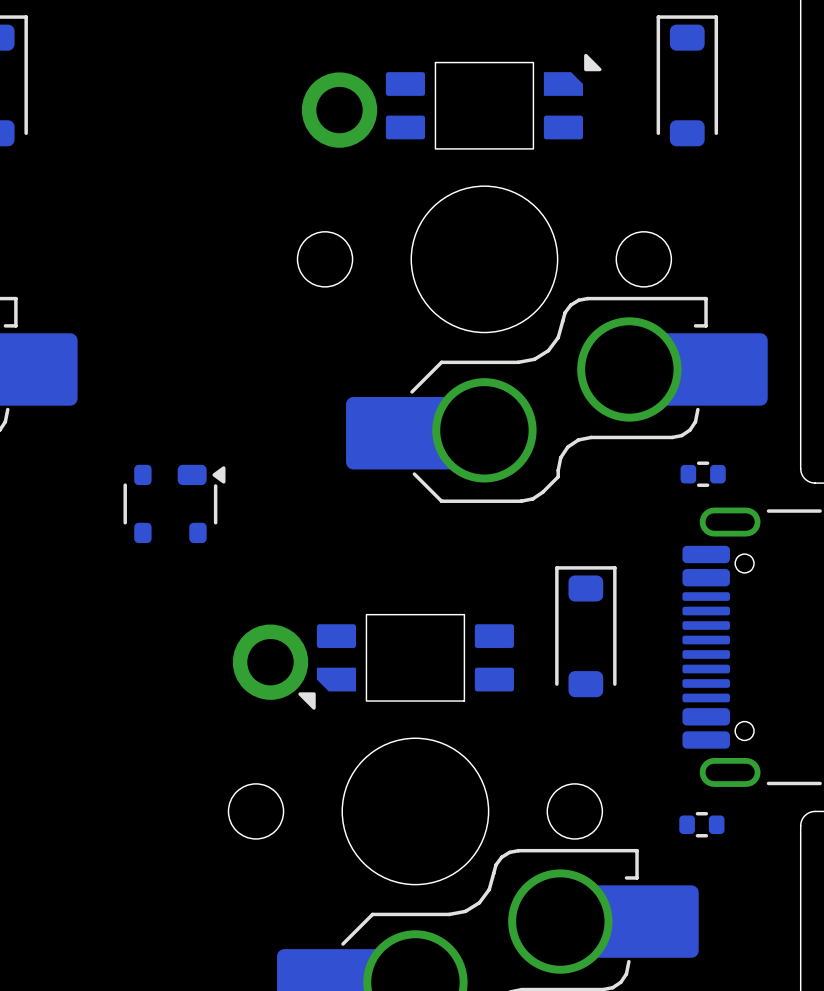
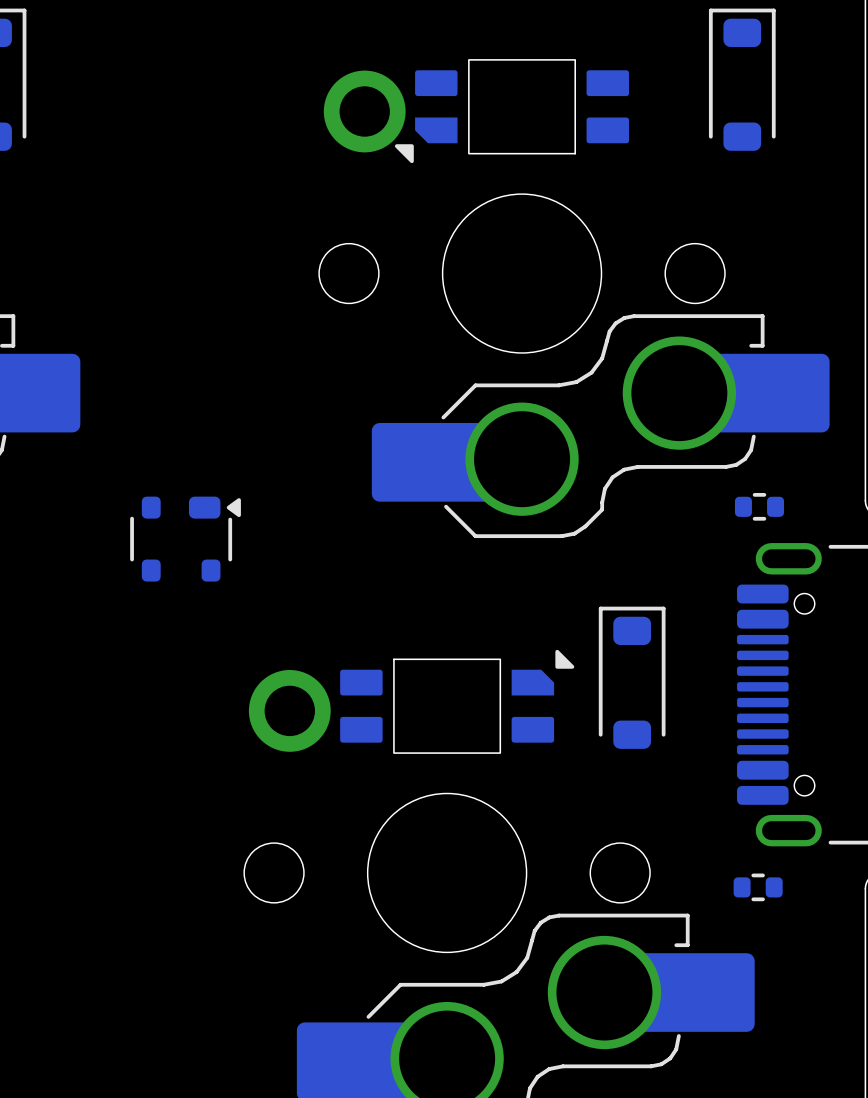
part rotation: 0° (493, 101) -> 180° (511, 111)
part rotation: 0° (406, 661) -> 180° (457, 701)

